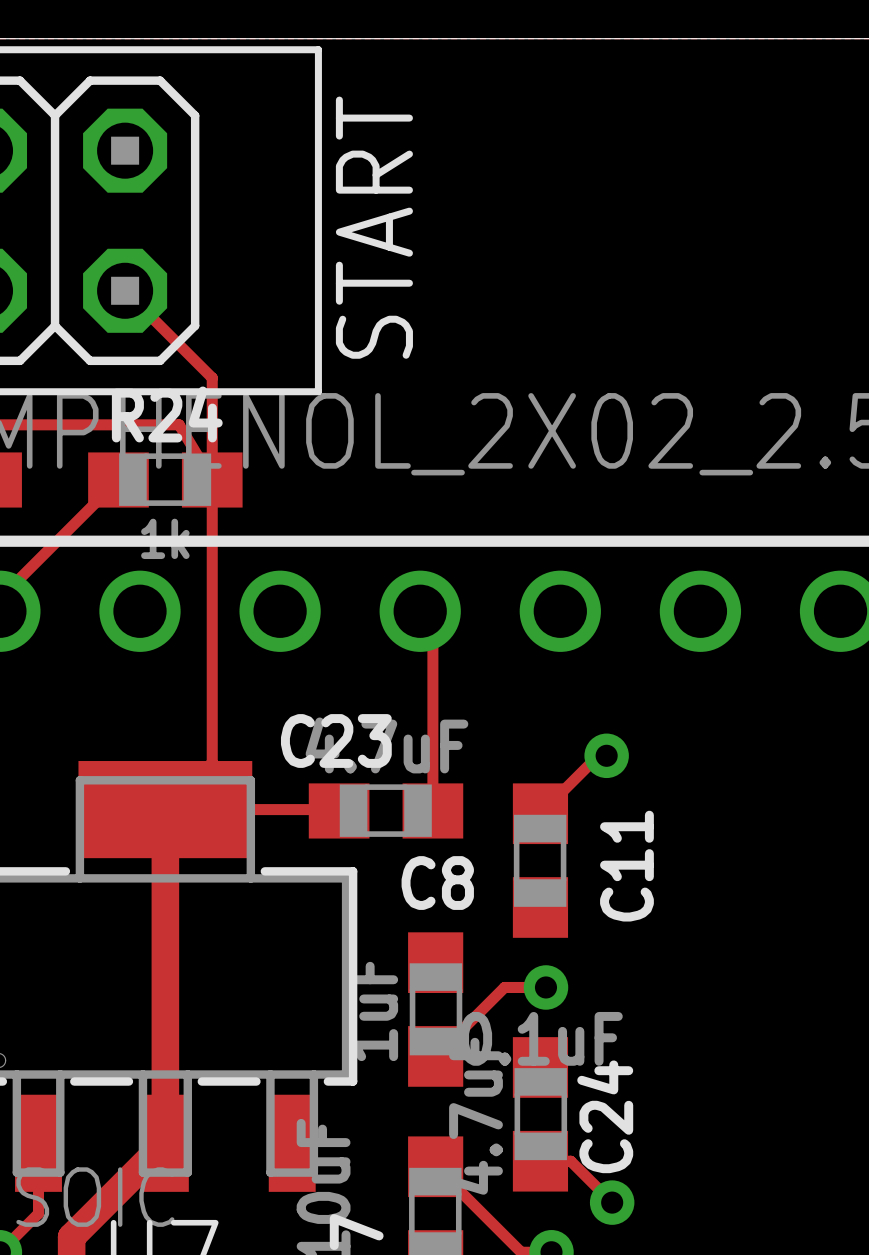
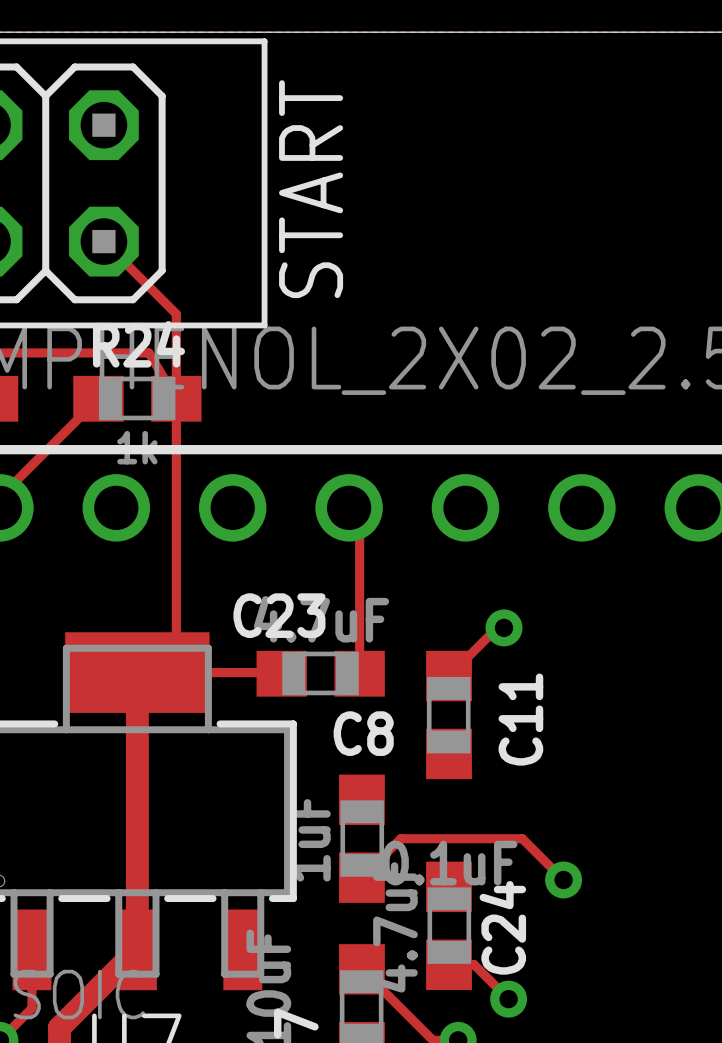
track: (545, 987) (504, 987) (482, 1009) -> (563, 879) (522, 838) (400, 838)
via position: (545, 987) -> (563, 879)

